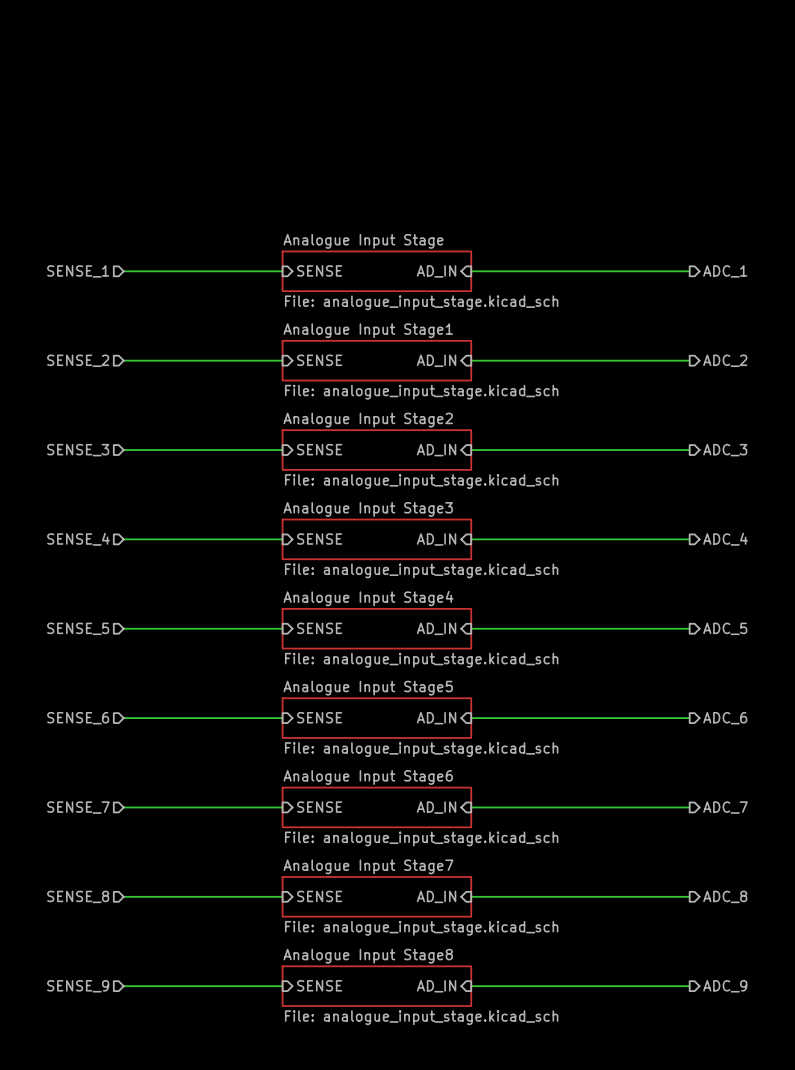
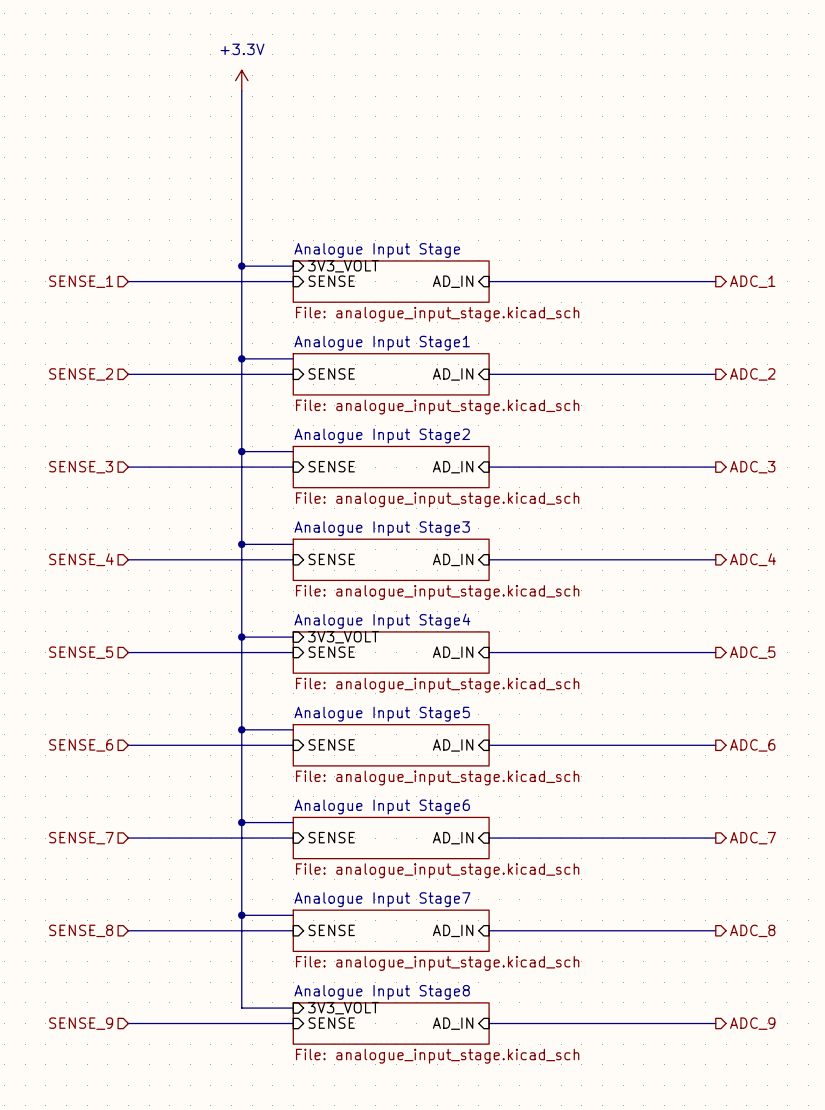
power symbol: none -> +3.3V (241, 80)
wire: none -> (241, 90) (241, 1008) (293, 1008)
wire: none -> (241, 266) (293, 266)
junction: none -> (241, 266)
sheet pin: none -> 3V3_VOLT (343, 266)
wire: none -> (241, 358) (293, 358)
junction: none -> (241, 358)
wire: none -> (241, 451) (293, 451)
junction: none -> (241, 451)
wire: none -> (241, 544) (293, 544)
junction: none -> (241, 544)
wire: none -> (241, 637) (293, 637)
junction: none -> (241, 637)
sheet pin: none -> 3V3_VOLT (343, 637)
wire: none -> (241, 729) (293, 729)
junction: none -> (241, 729)
wire: none -> (241, 822) (293, 822)
junction: none -> (241, 822)
wire: none -> (241, 915) (293, 915)
junction: none -> (241, 915)
sheet pin: none -> 3V3_VOLT (343, 1008)

